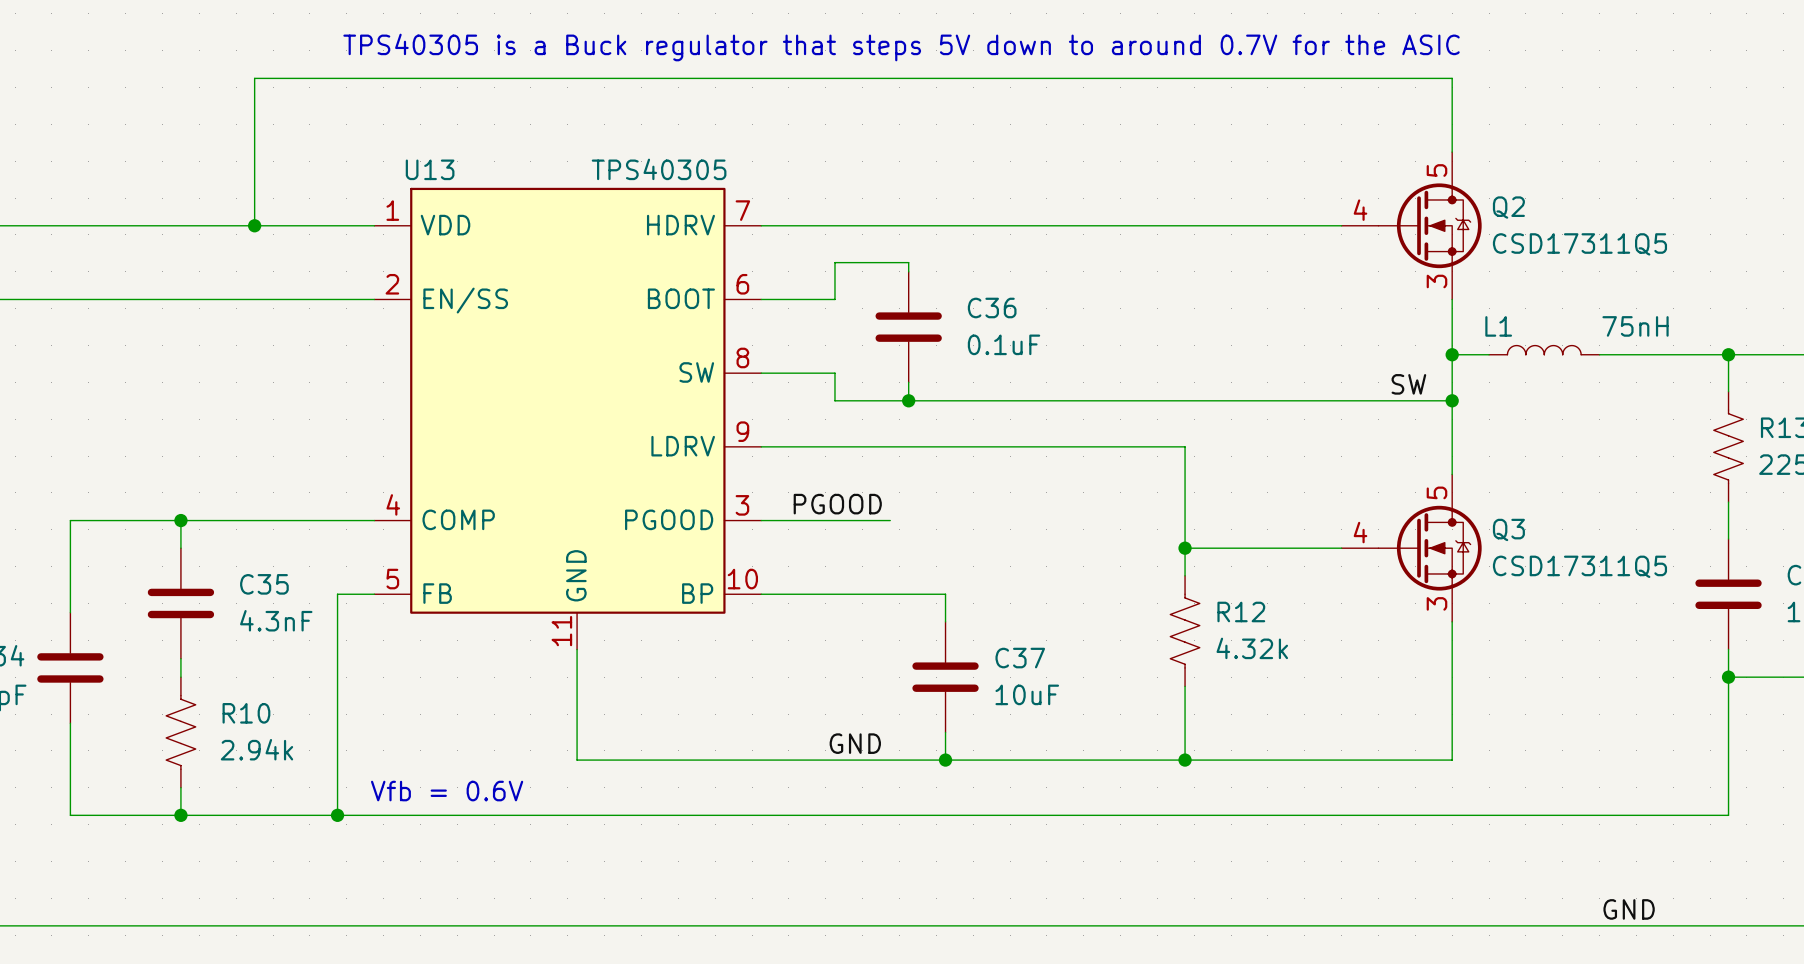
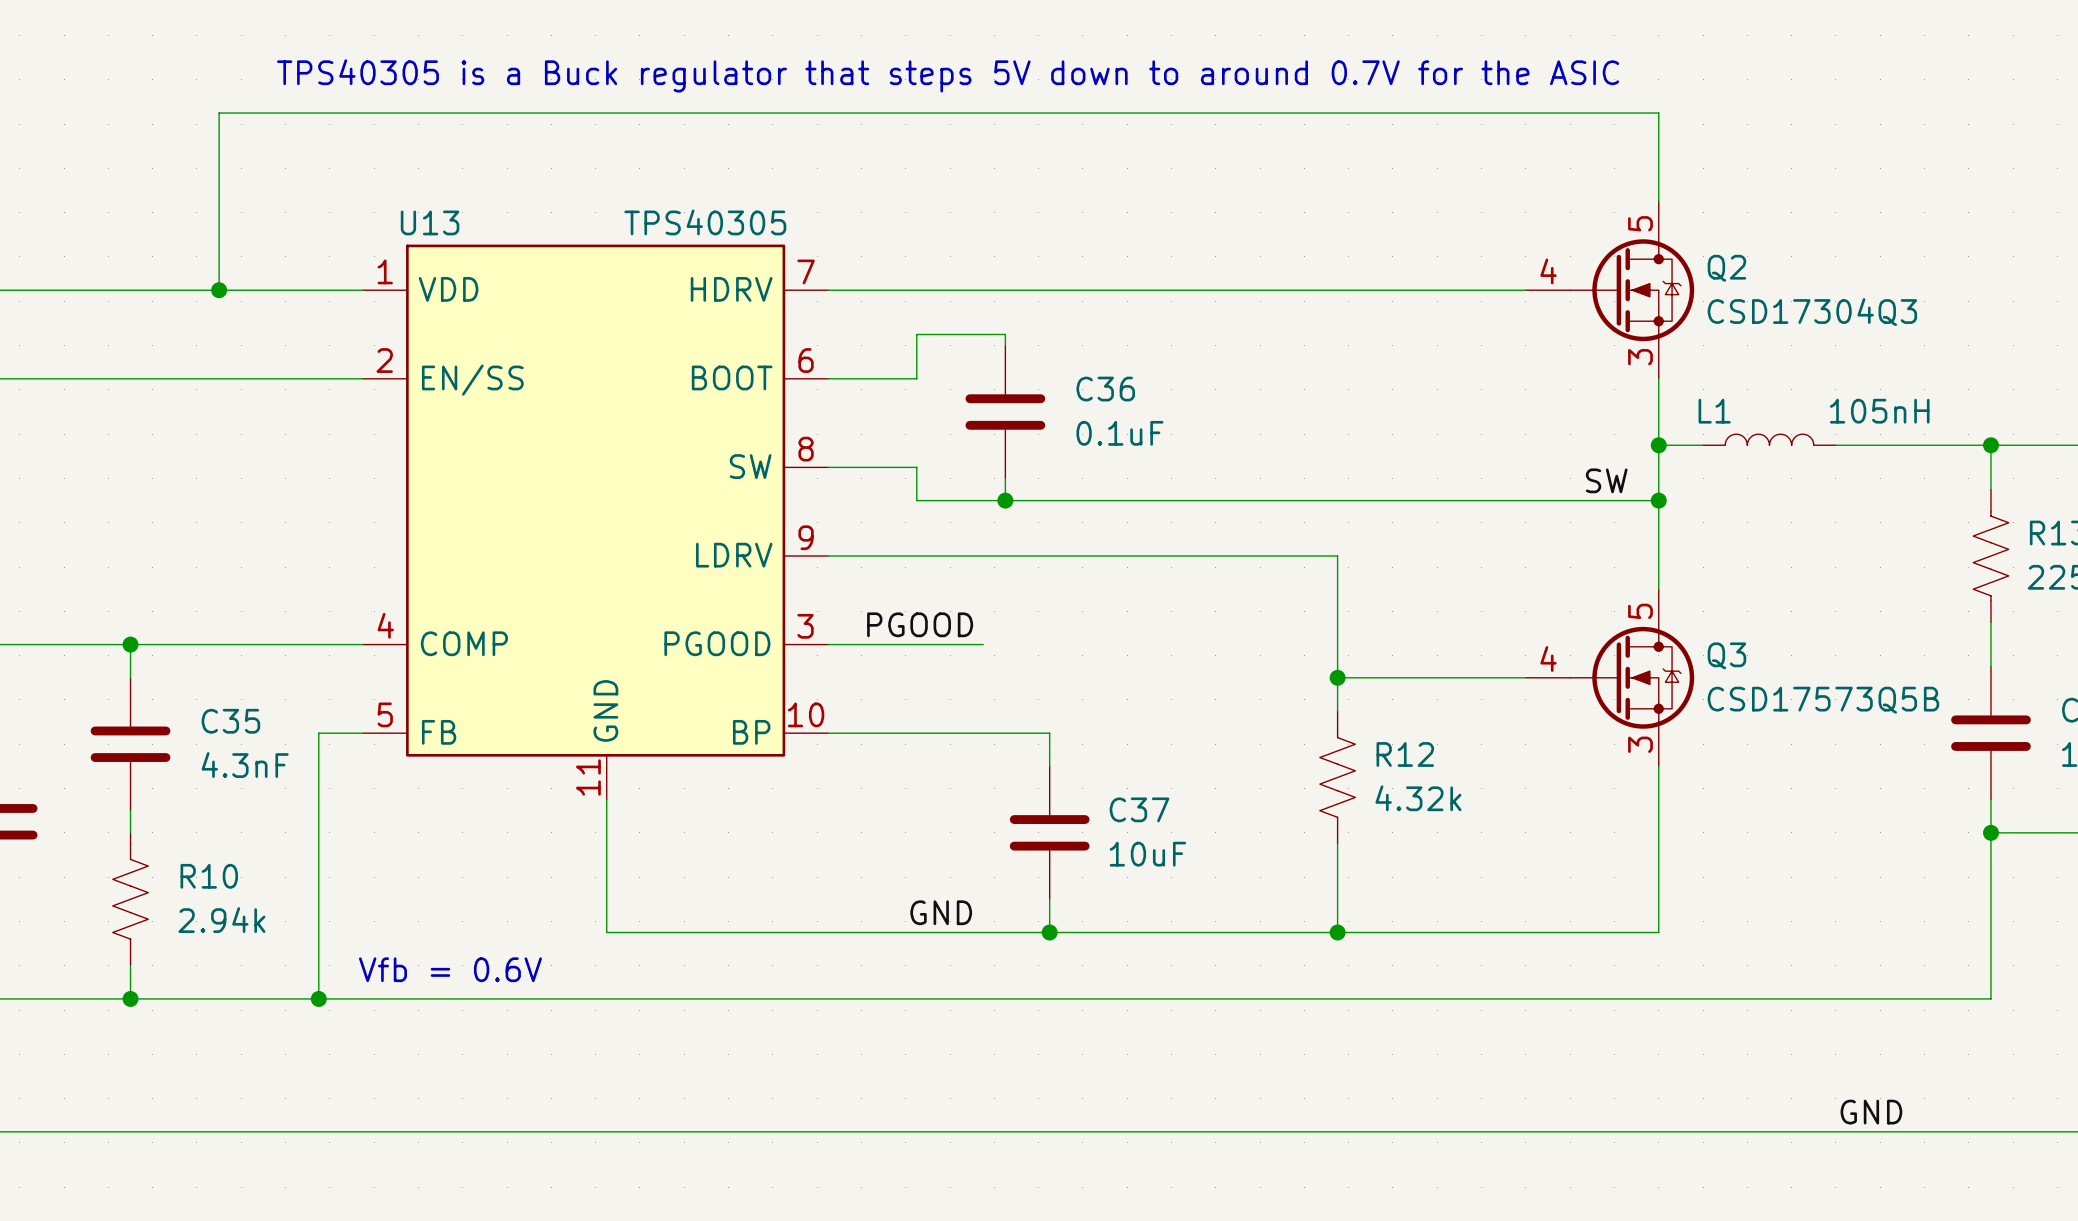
text position: TPS40305 is a Buck regulator that steps 5V down to around 0.7V for the ASIC (901, 47) -> TPS40305 is a Buck regulator that steps 5V down to around 0.7V for the ASIC (948, 75)
Q2 value: CSD17311Q5 (1579, 244) -> CSD17304Q3 (1812, 312)
L1 value: 75nH (1635, 326) -> 105nH (1879, 411)
Q3 value: CSD17311Q5 (1579, 566) -> CSD17573Q5B (1823, 700)

